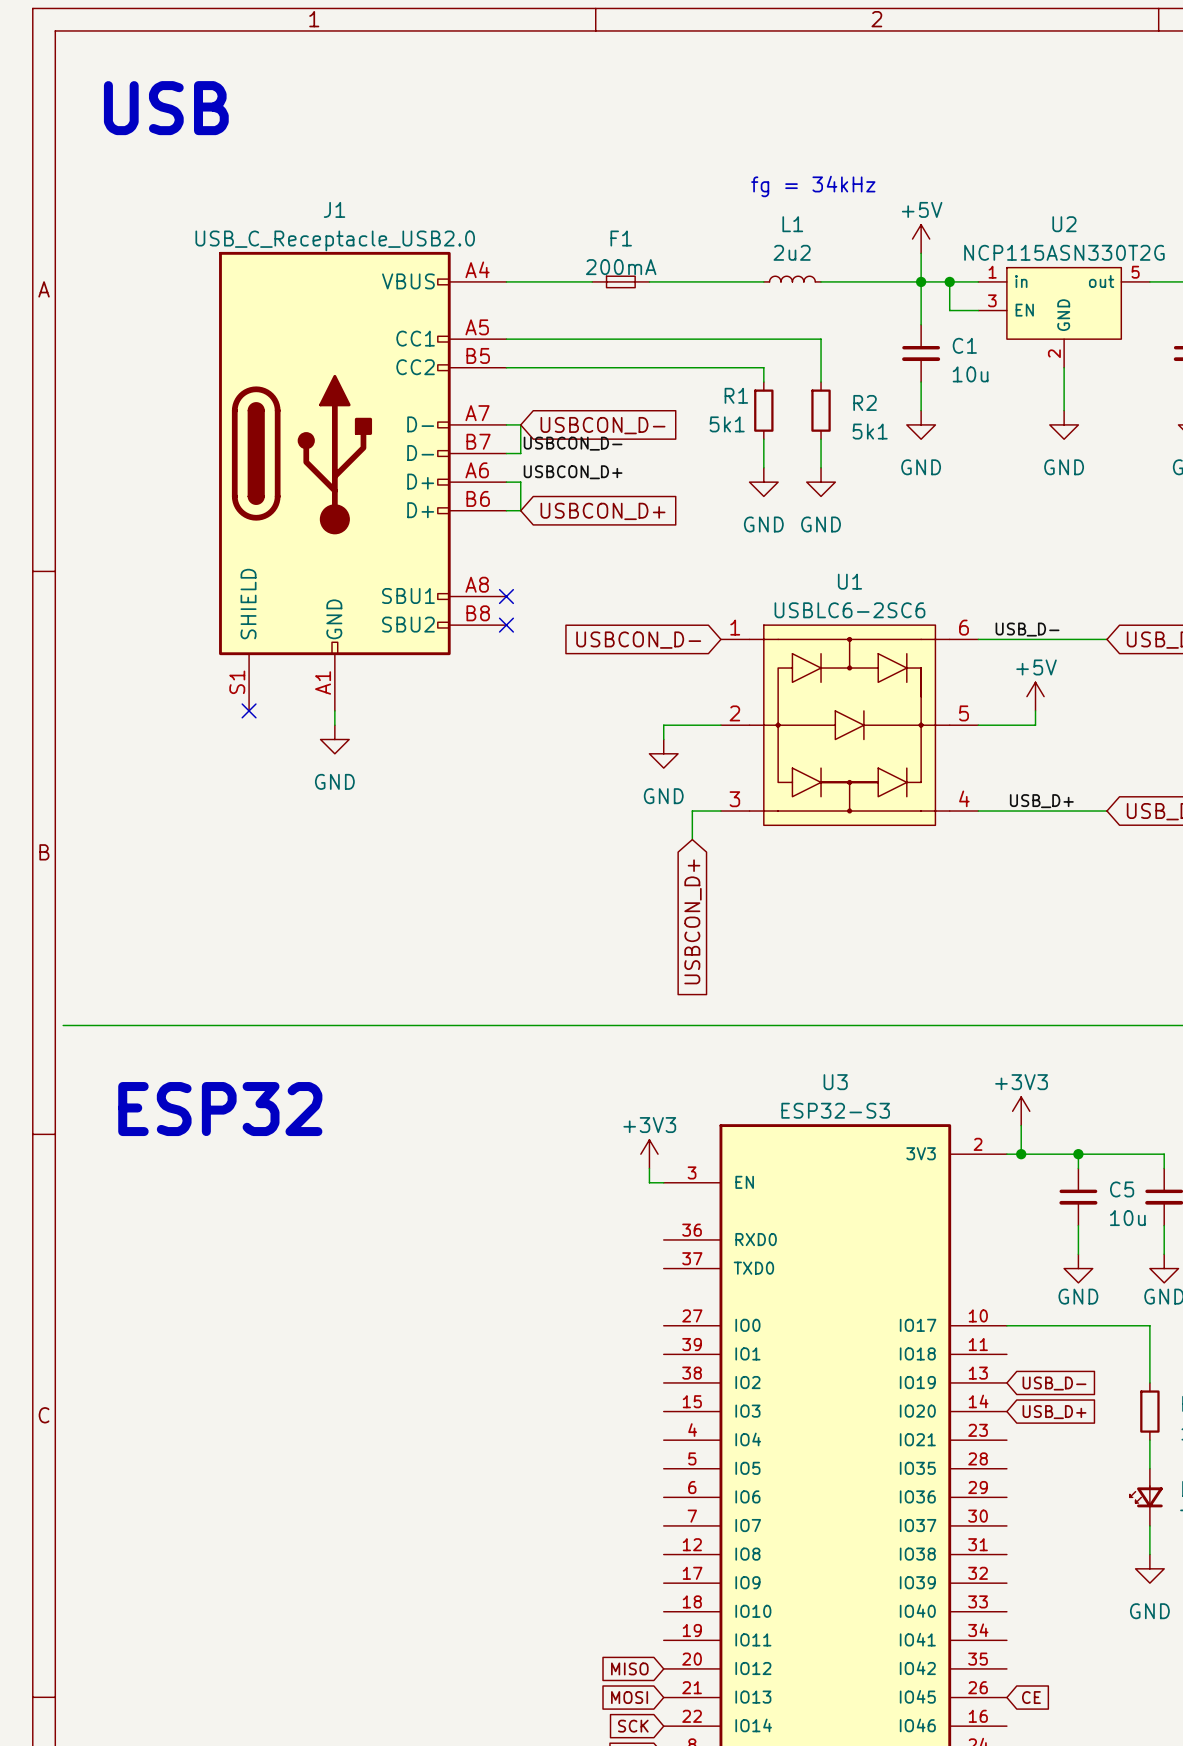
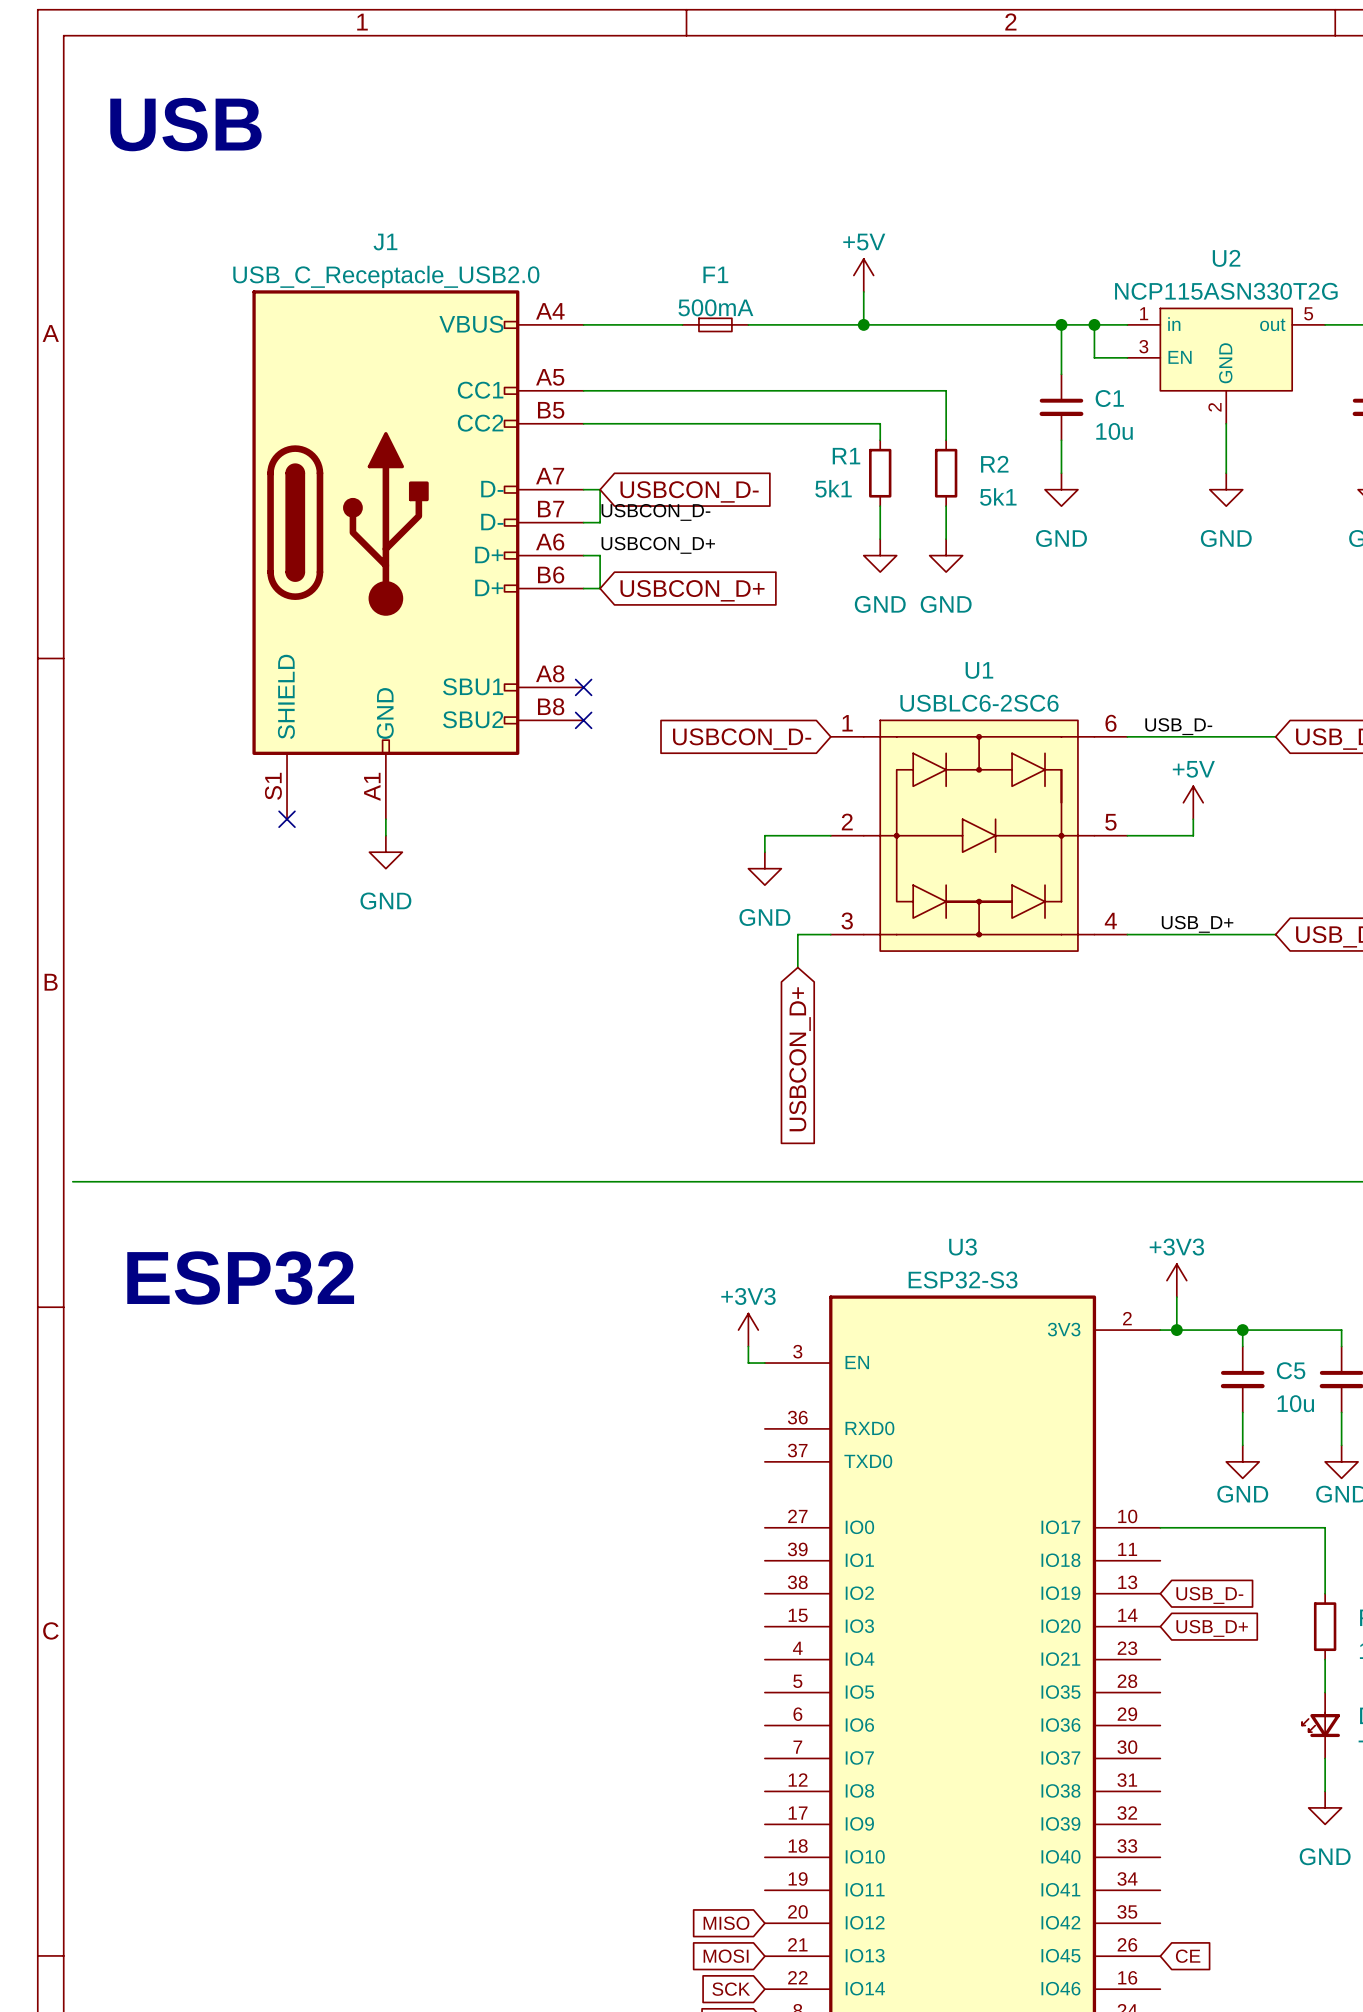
text: fg = 34kHz (813, 186) -> none
power symbol position: +5V (921, 239) -> +5V (863, 275)
wire: (921, 253) (921, 281) -> (863, 291) (863, 324)
F1 value: 200mA (621, 267) -> 500mA (715, 307)
L1: 2u2 (792, 279) -> none
junction: none -> (863, 324)
wire: none -> (880, 324) (946, 324)

